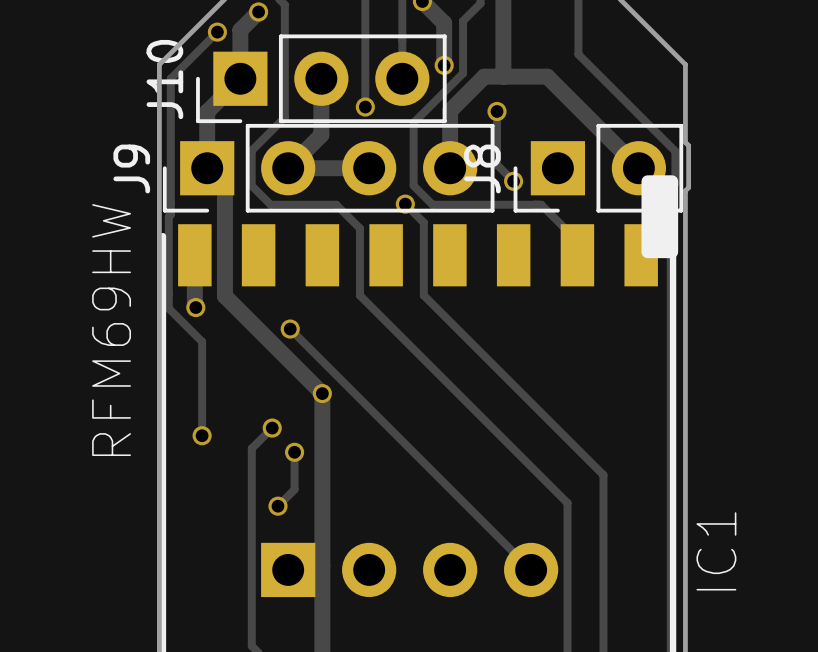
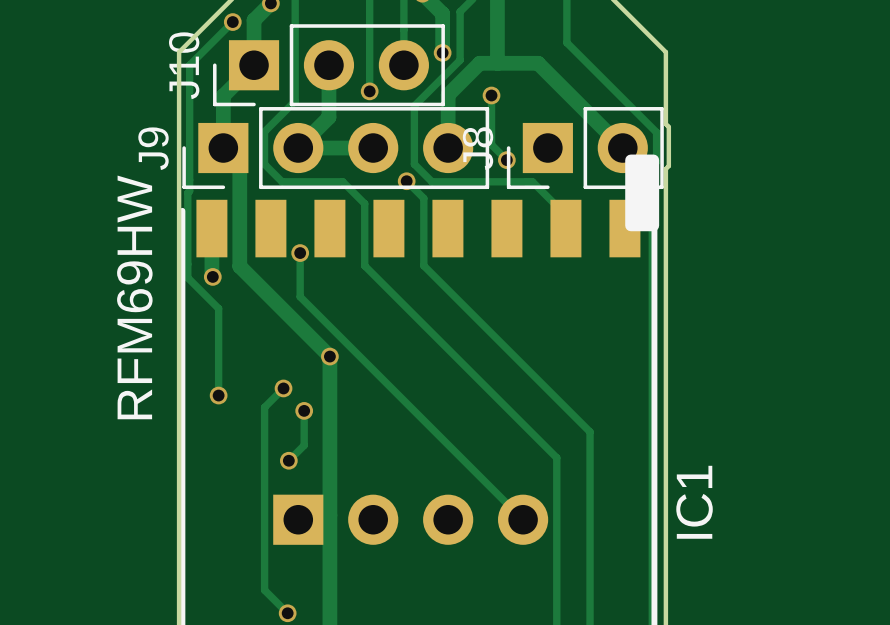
track: none -> (300, 253) (300, 296)
via position: (290, 329) -> (300, 253)

